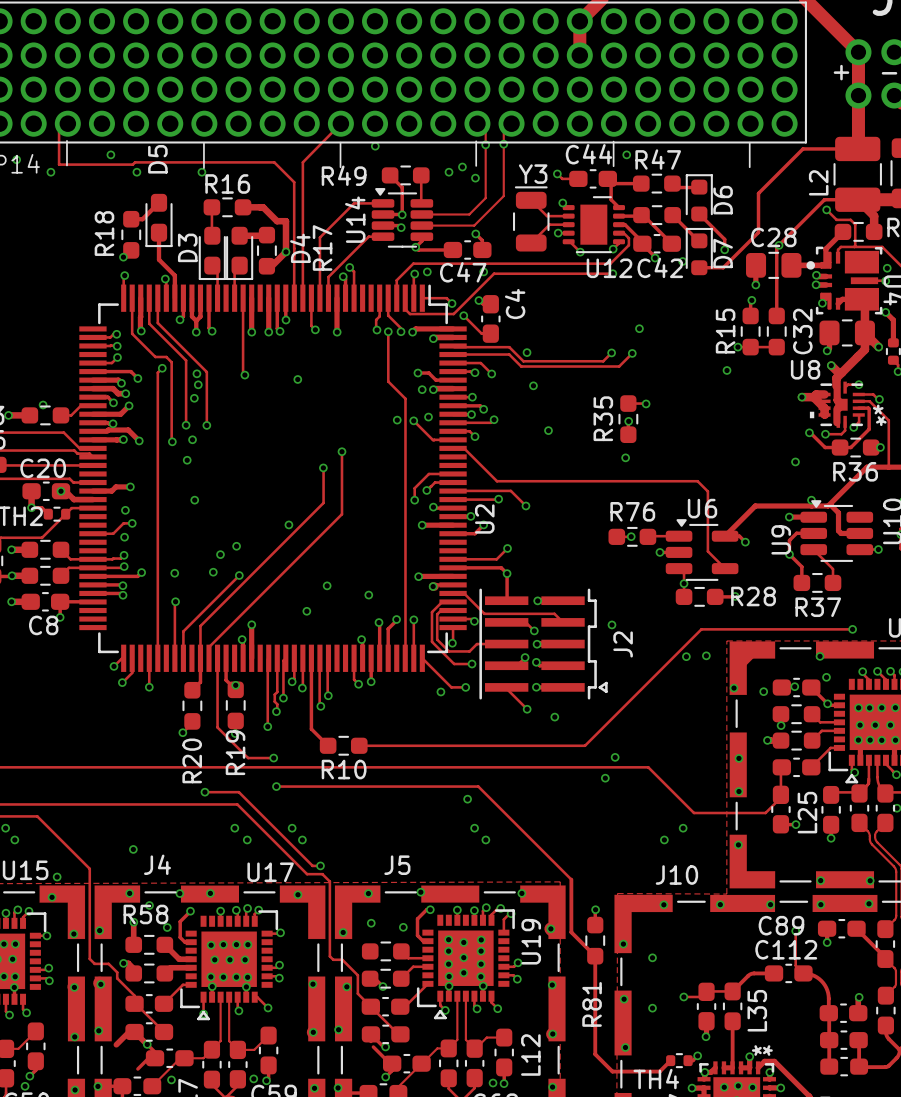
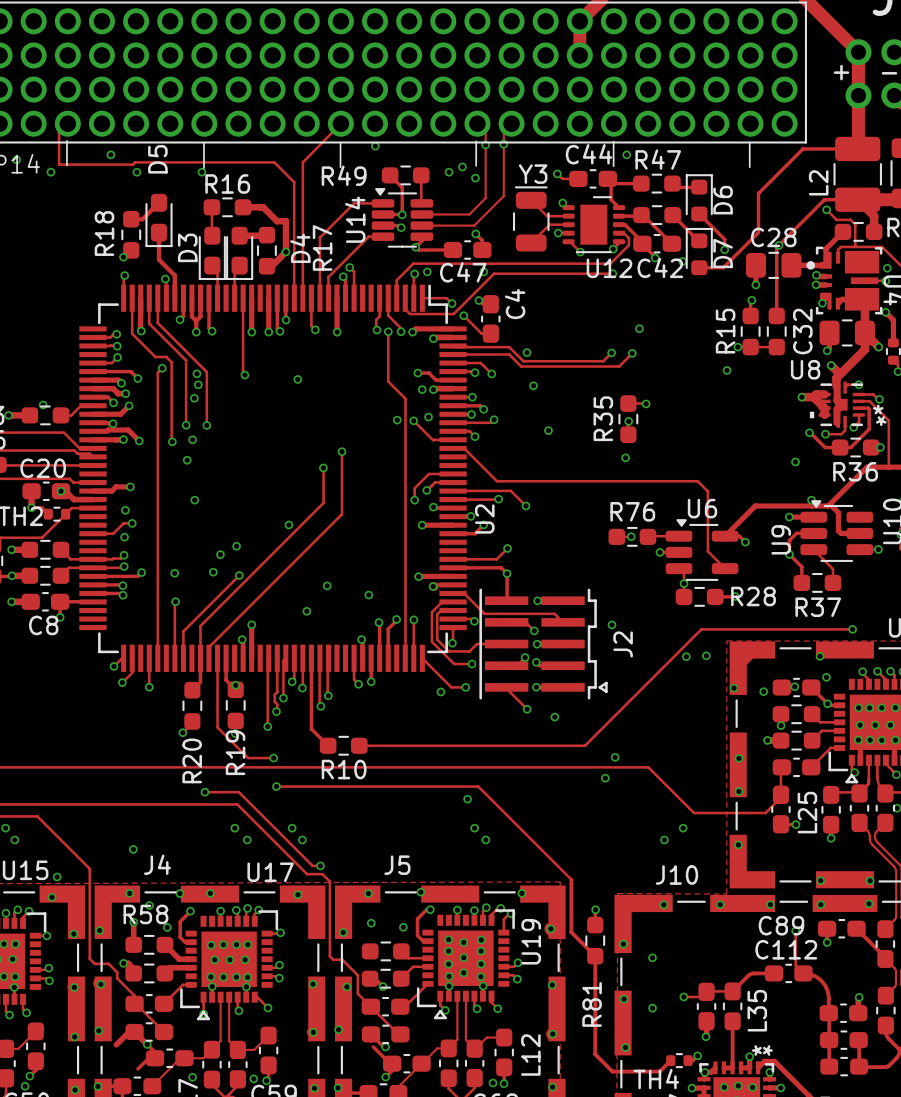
via: none -> (192, 1077)
via: (171, 1079) -> none

